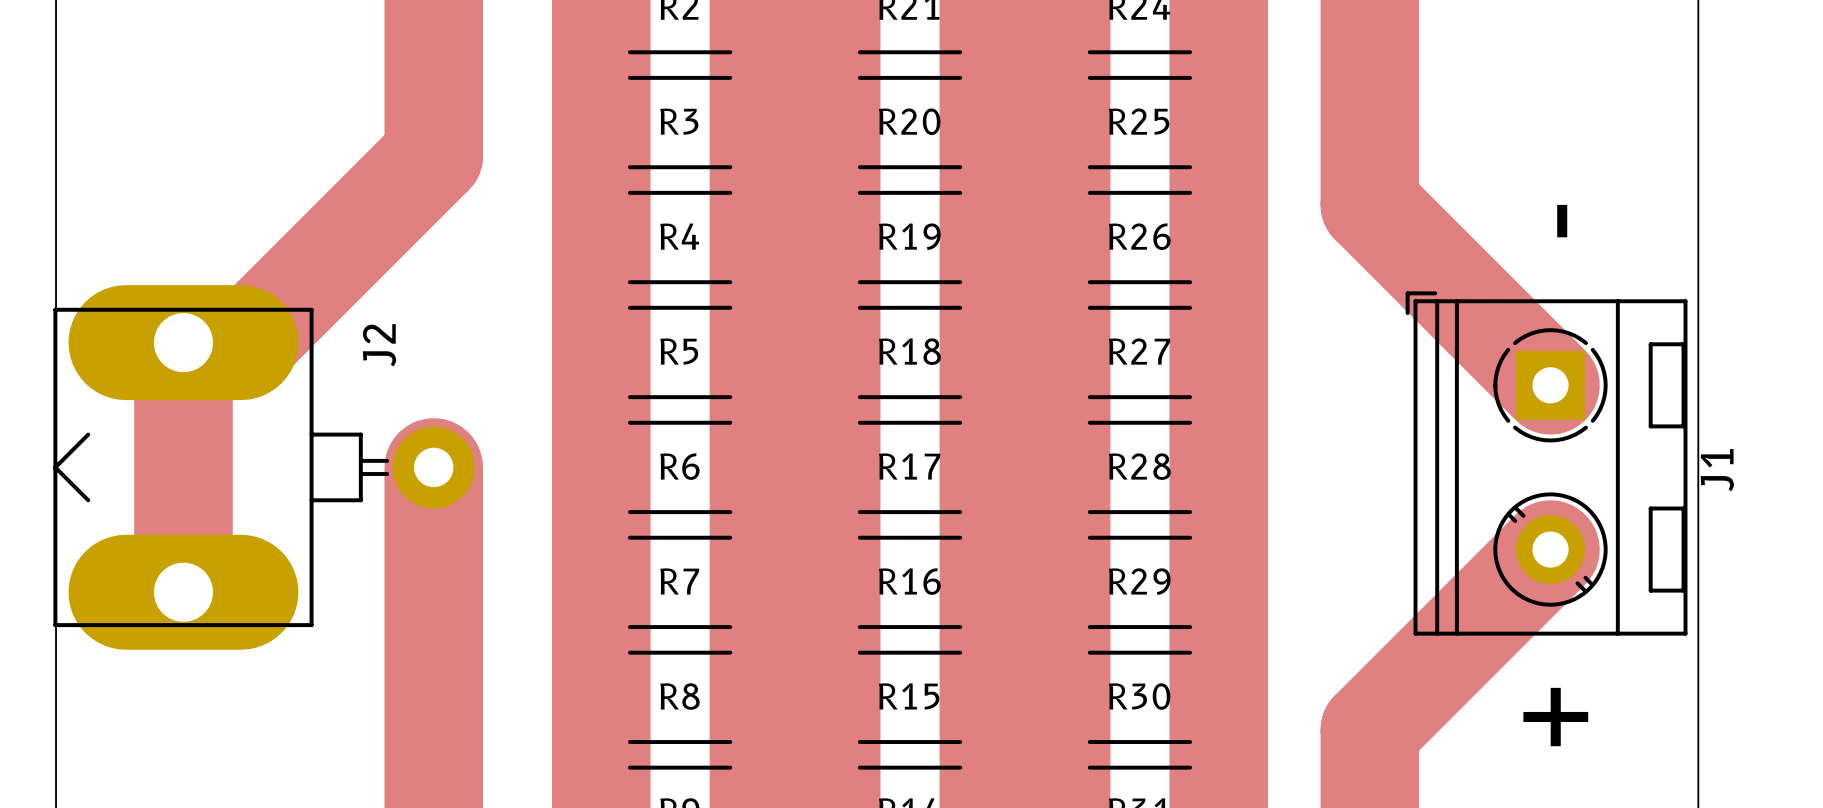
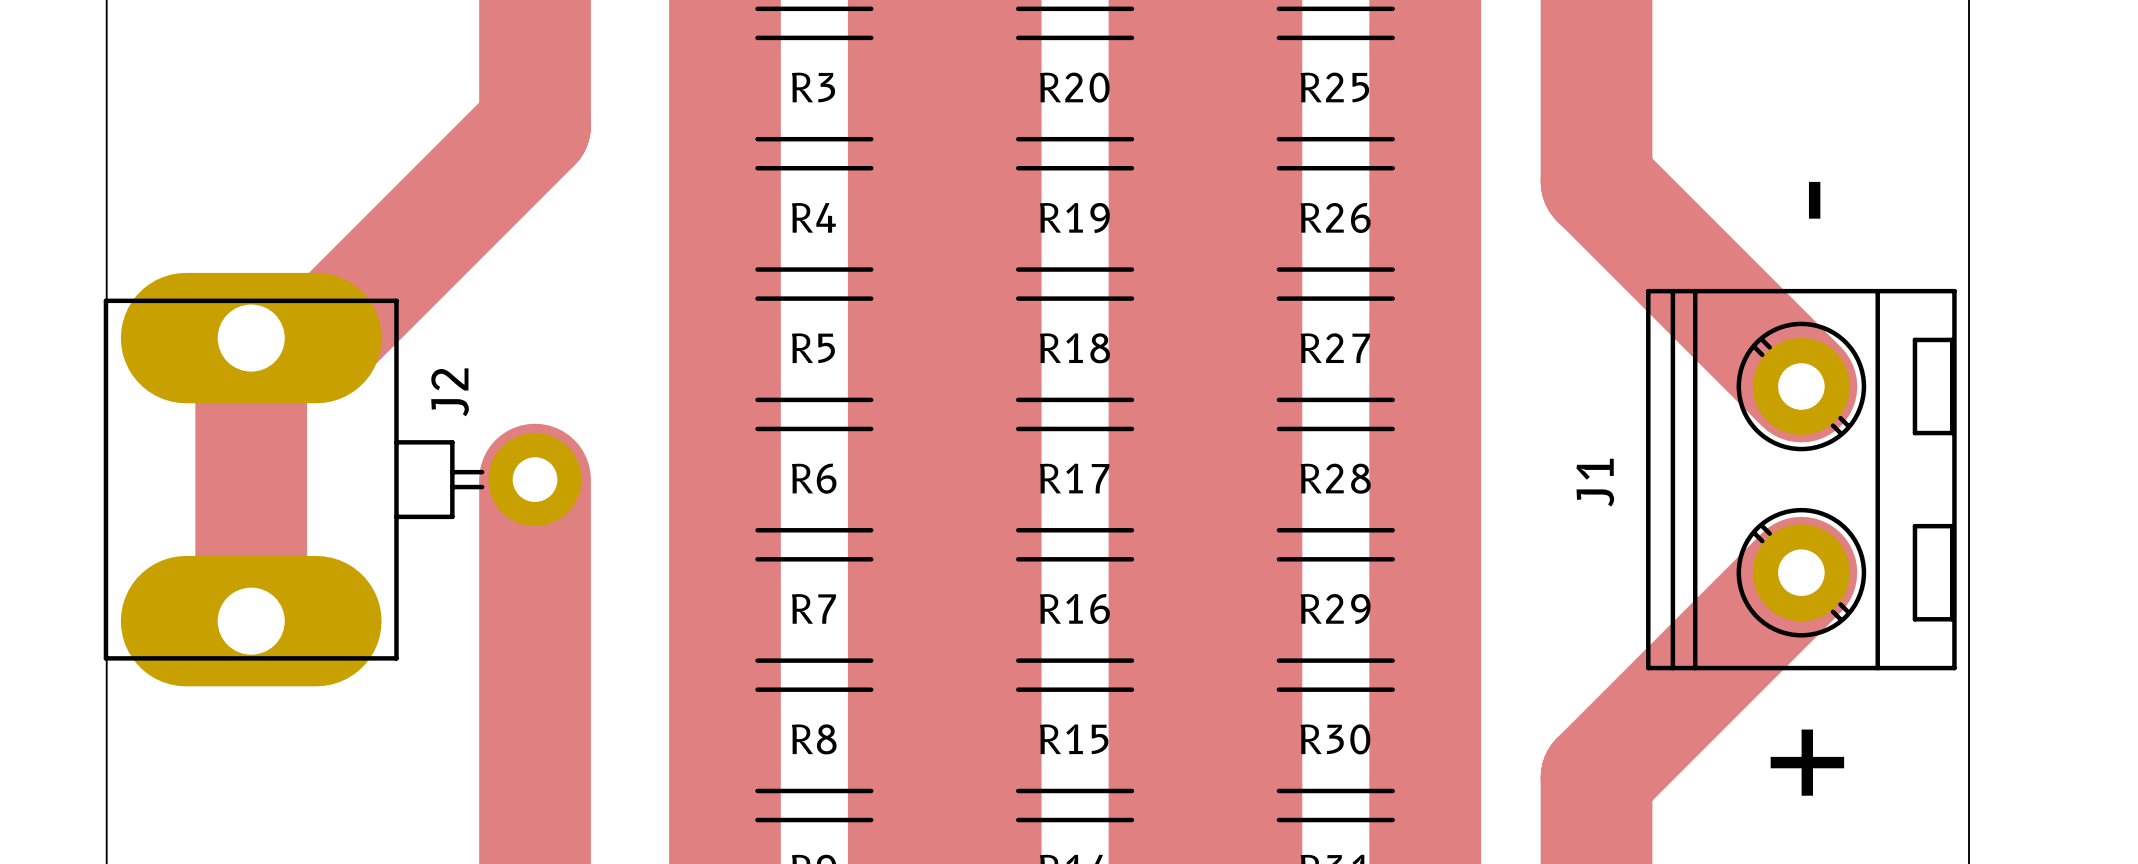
J2 footprint: [53, 285, 475, 650] -> [103, 272, 582, 687]
J1 footprint: [1405, 291, 1688, 636] -> [1646, 288, 1957, 671]
J2 name position: J2 (379, 345) -> J2 (450, 392)
J1 name position: J1 (1717, 470) -> J1 (1595, 482)

